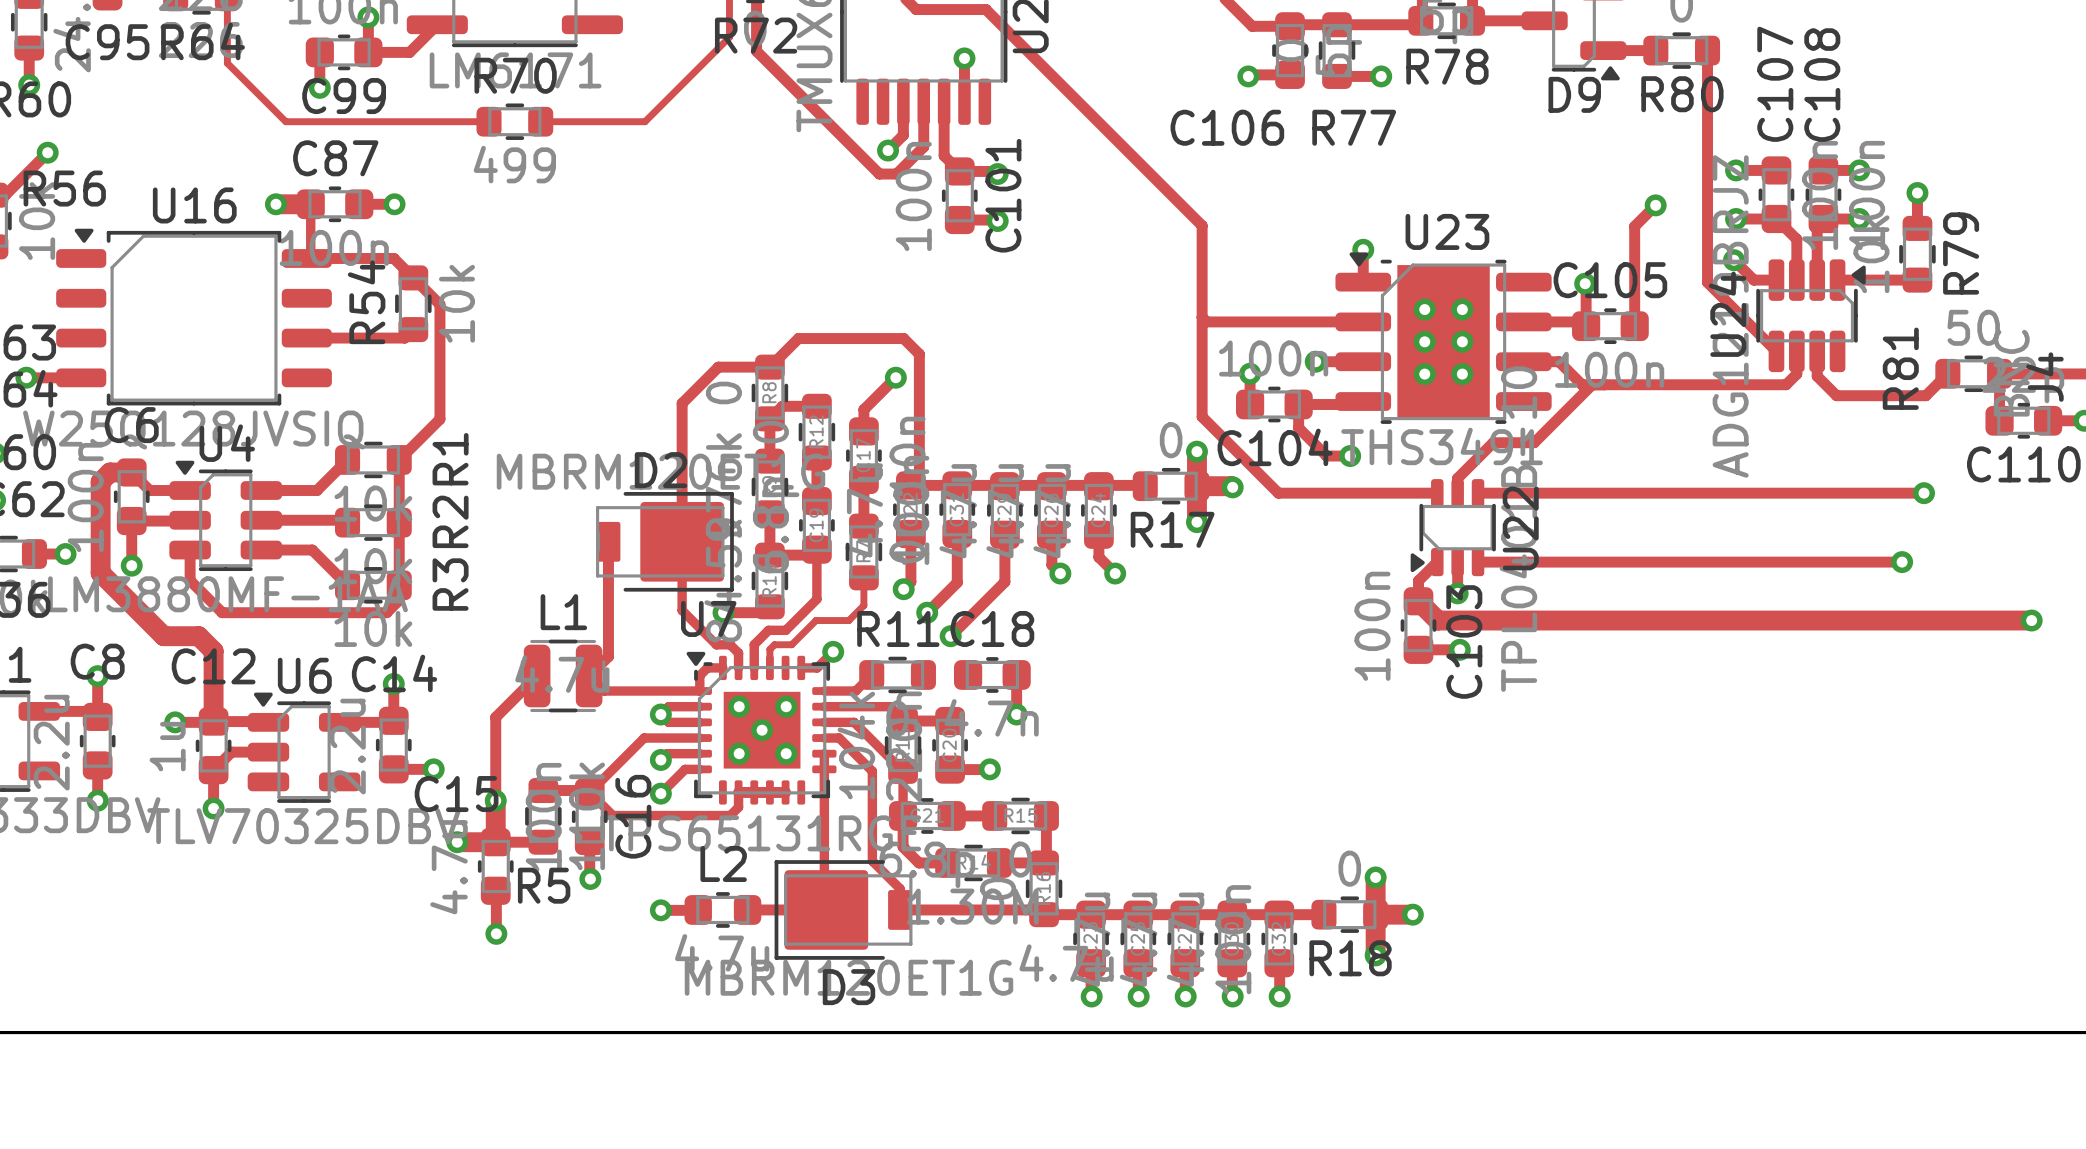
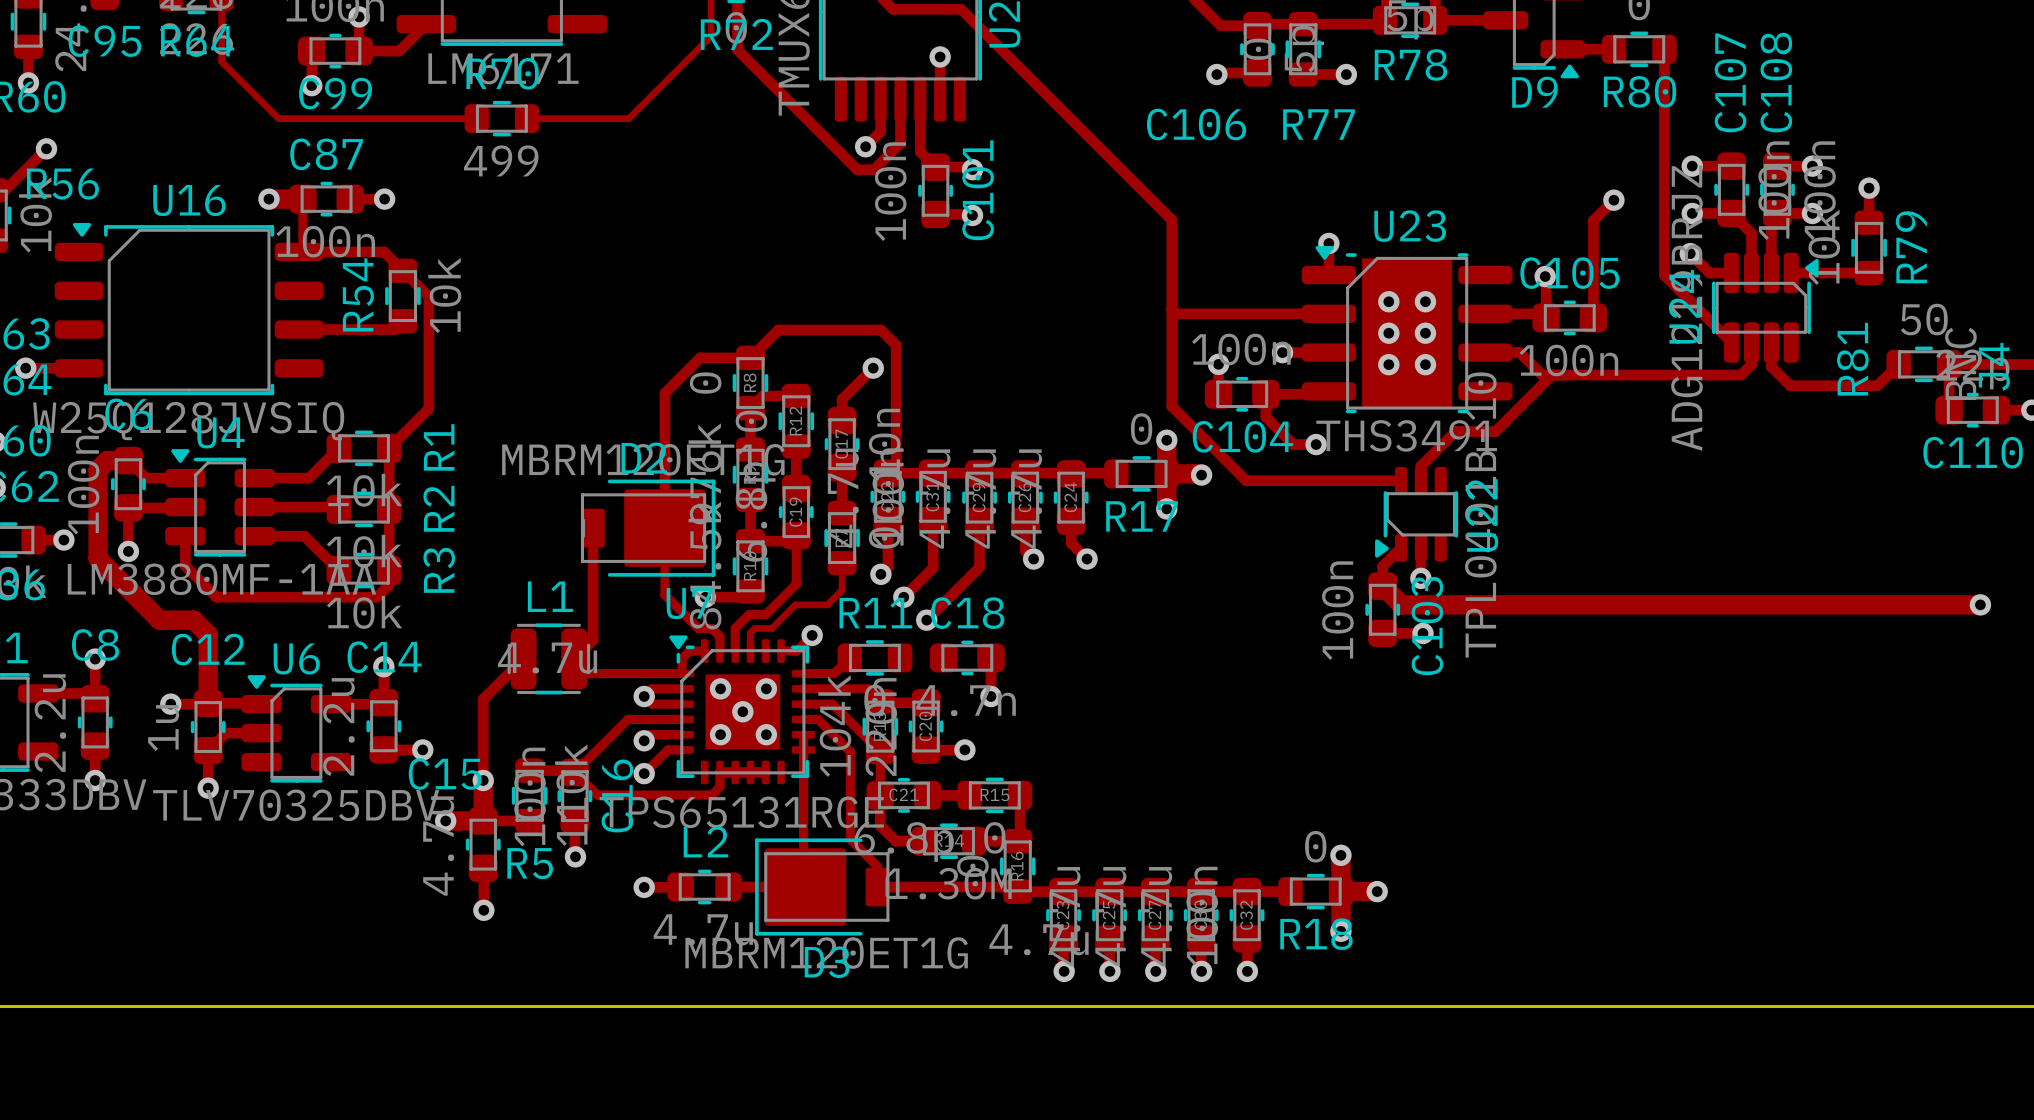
track: (1478, 493) (1924, 493) -> none
via: (1924, 493) -> none
track: (1478, 562) (1902, 562) -> none
via: (1902, 562) -> none

